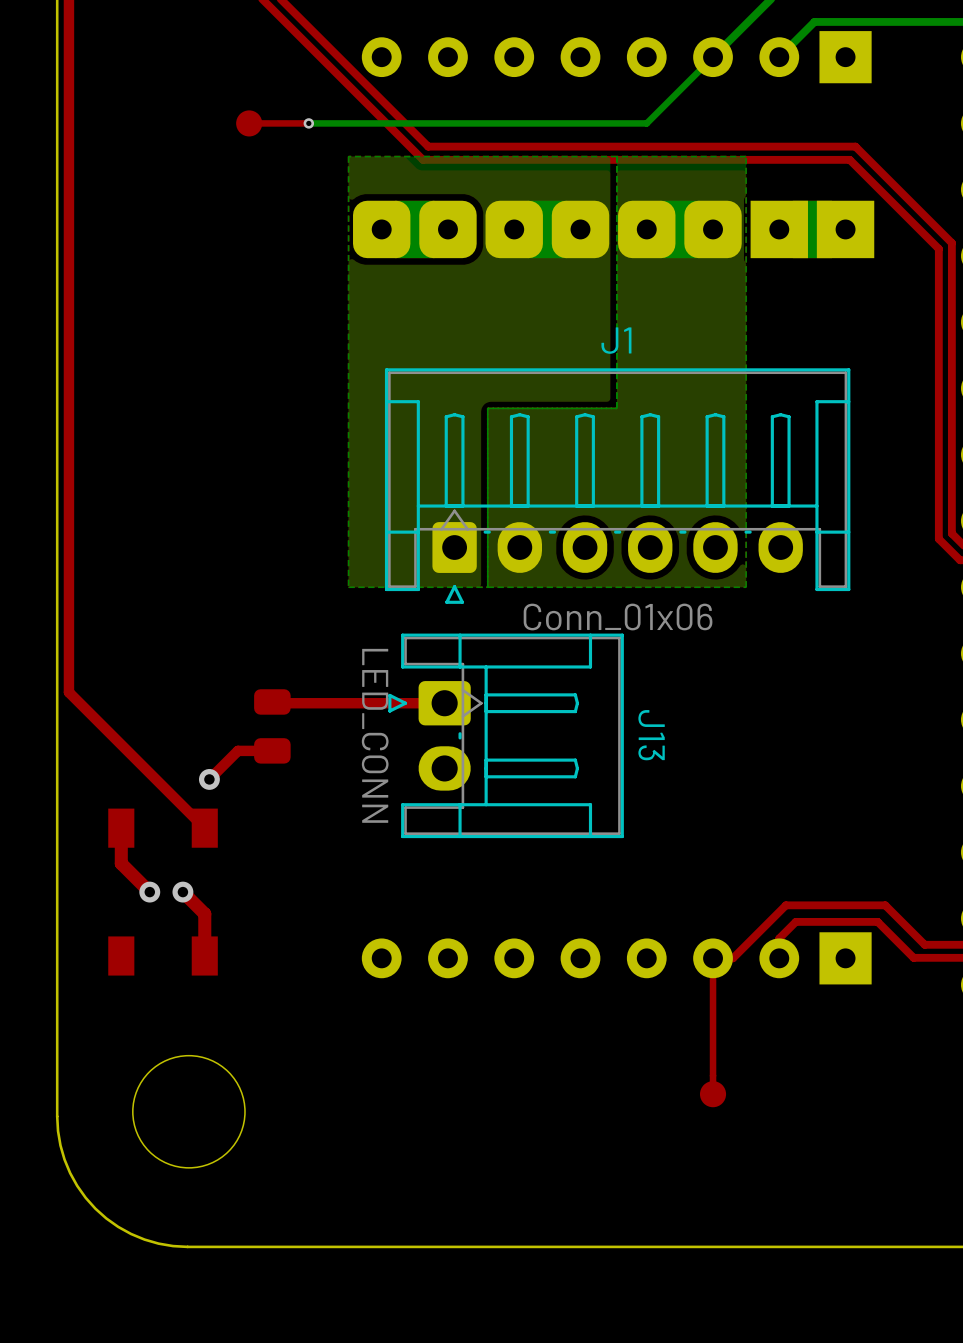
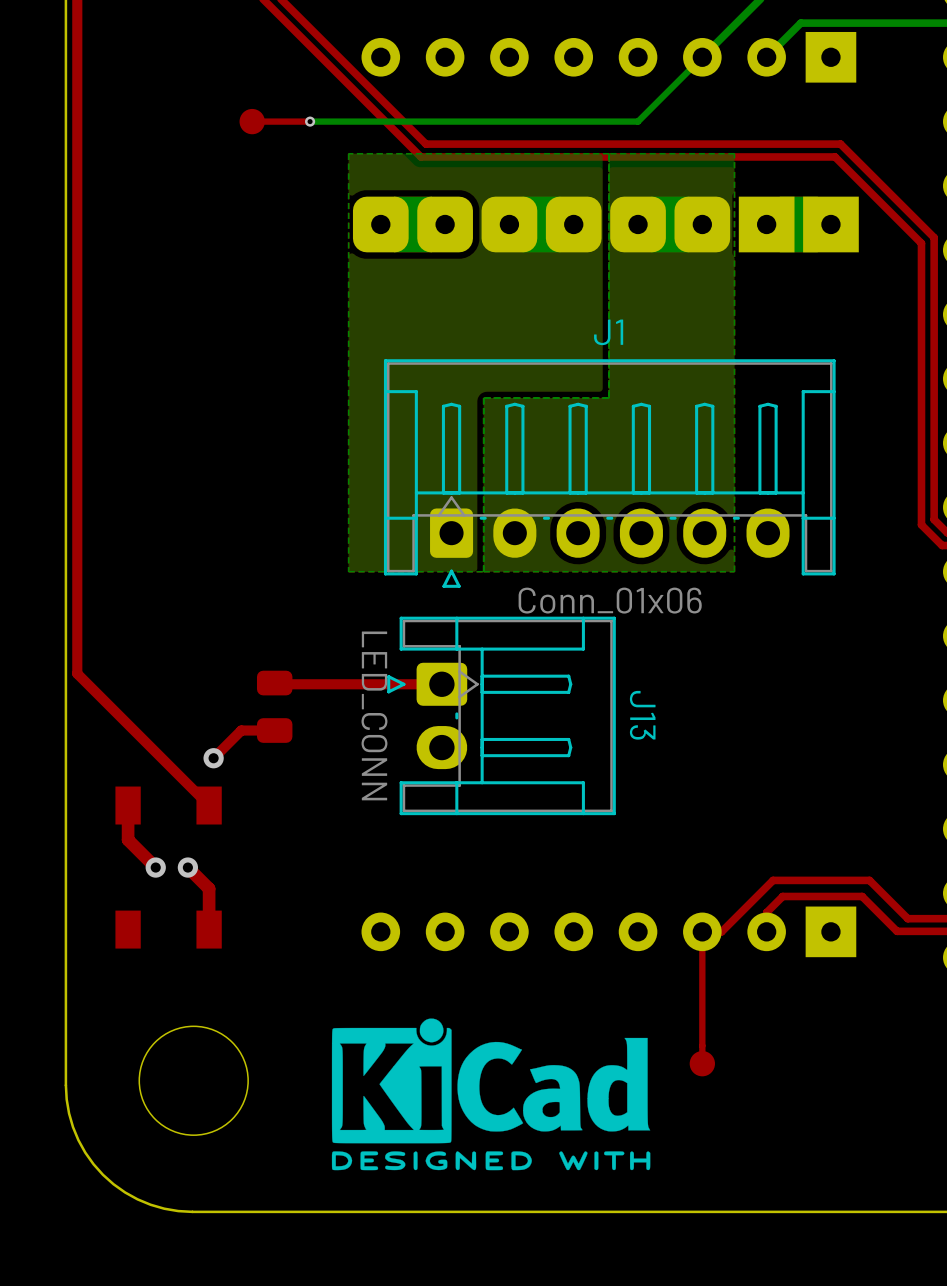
drawing: none -> [331, 1018, 651, 1171]

